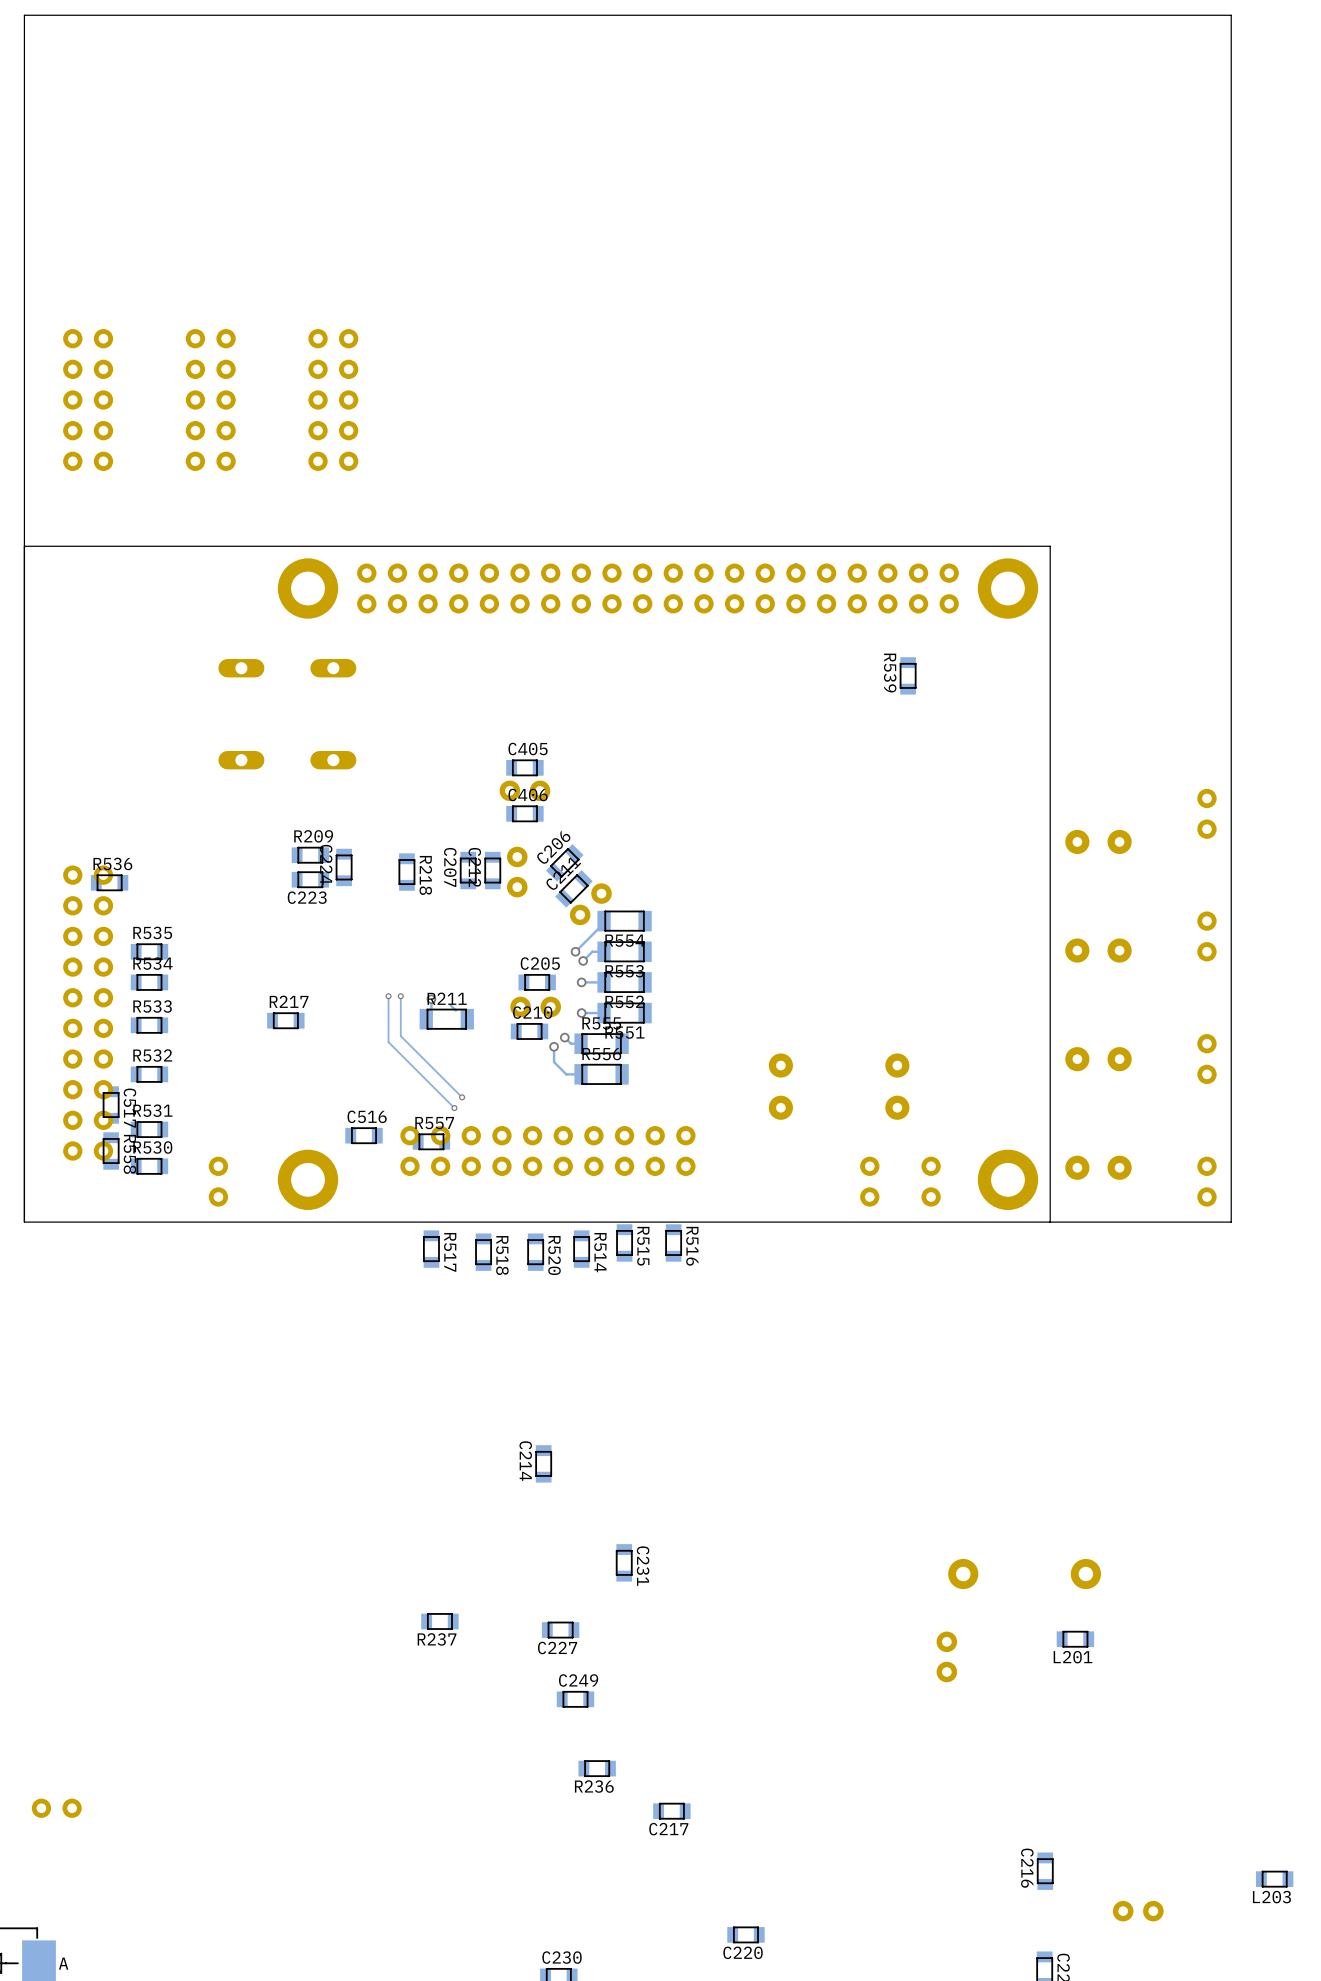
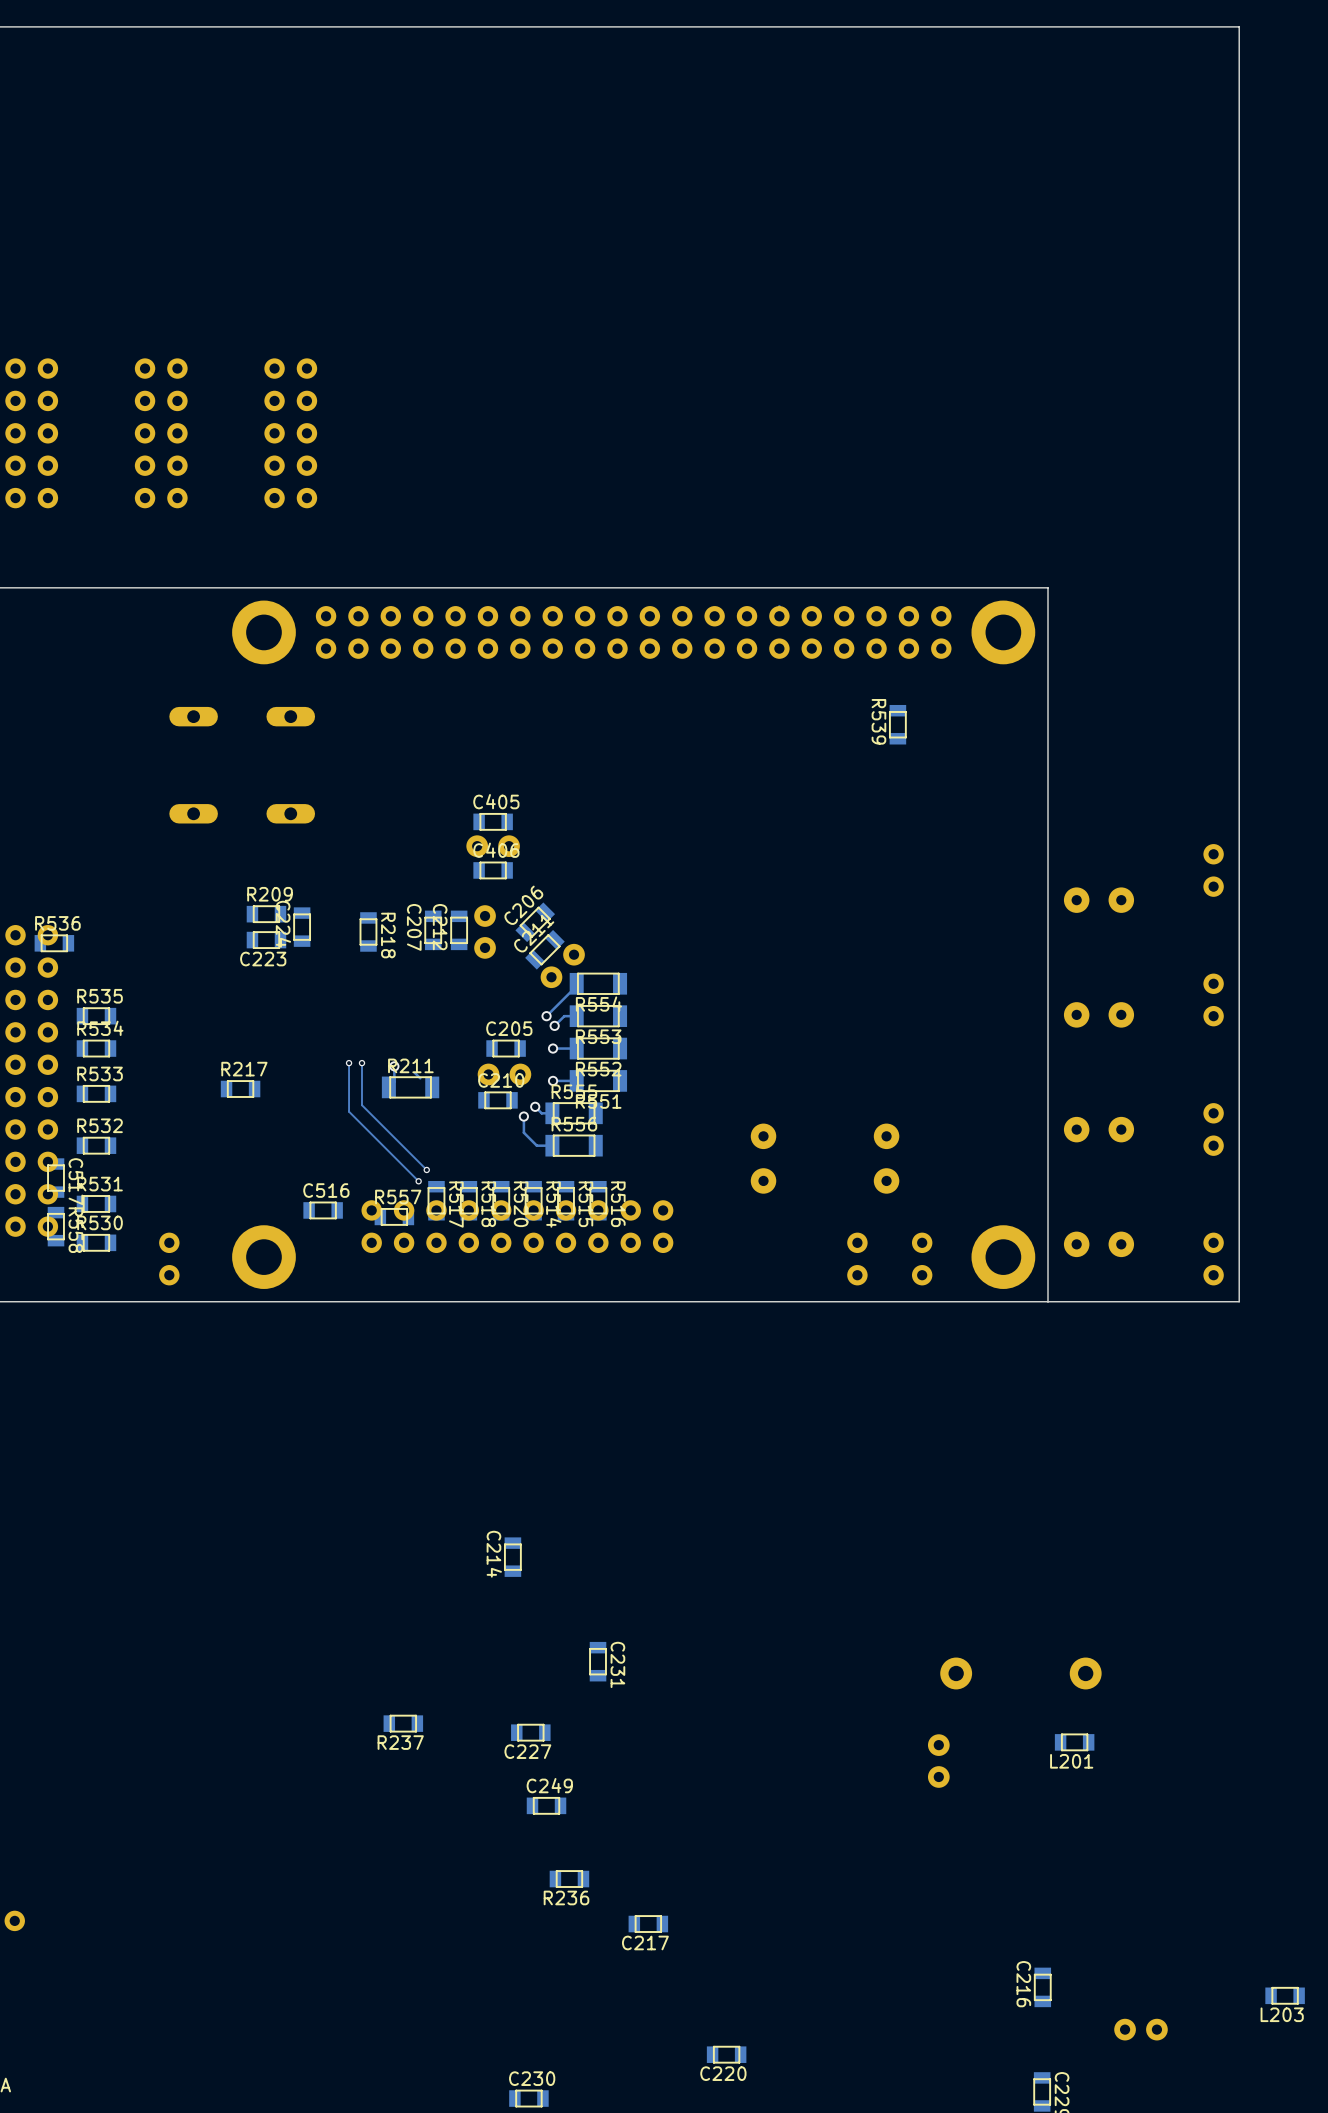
R515 position: (624, 1242) -> (565, 1200)
R516 position: (673, 1242) -> (598, 1200)
R517 position: (431, 1249) -> (436, 1200)
R514 position: (581, 1249) -> (533, 1200)
R518 position: (483, 1252) -> (468, 1200)
R520 position: (535, 1252) -> (501, 1200)

